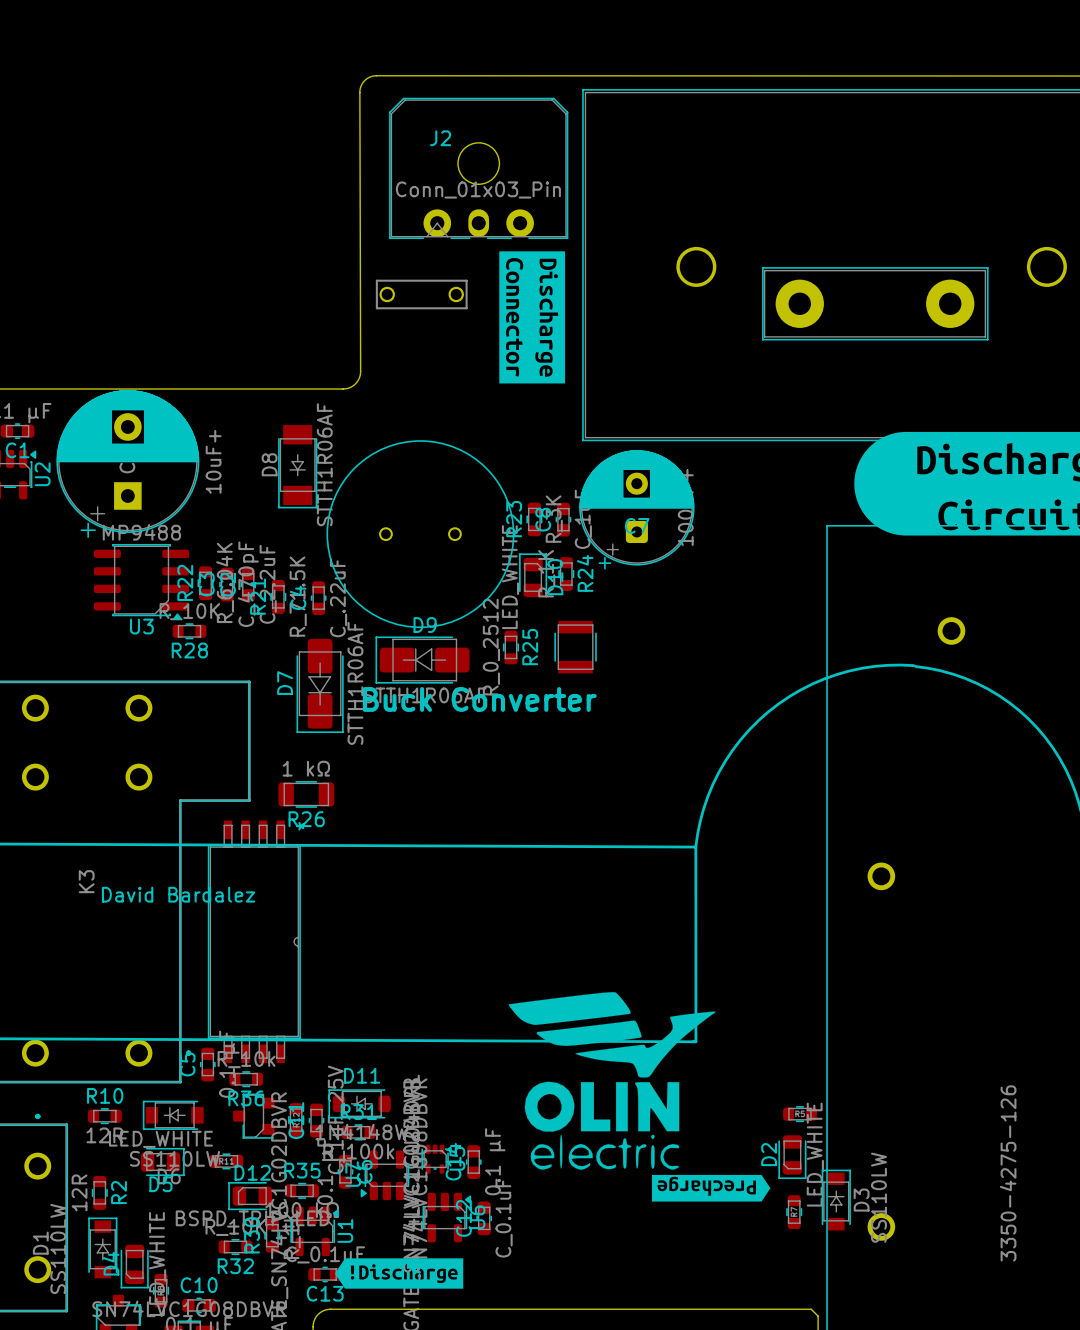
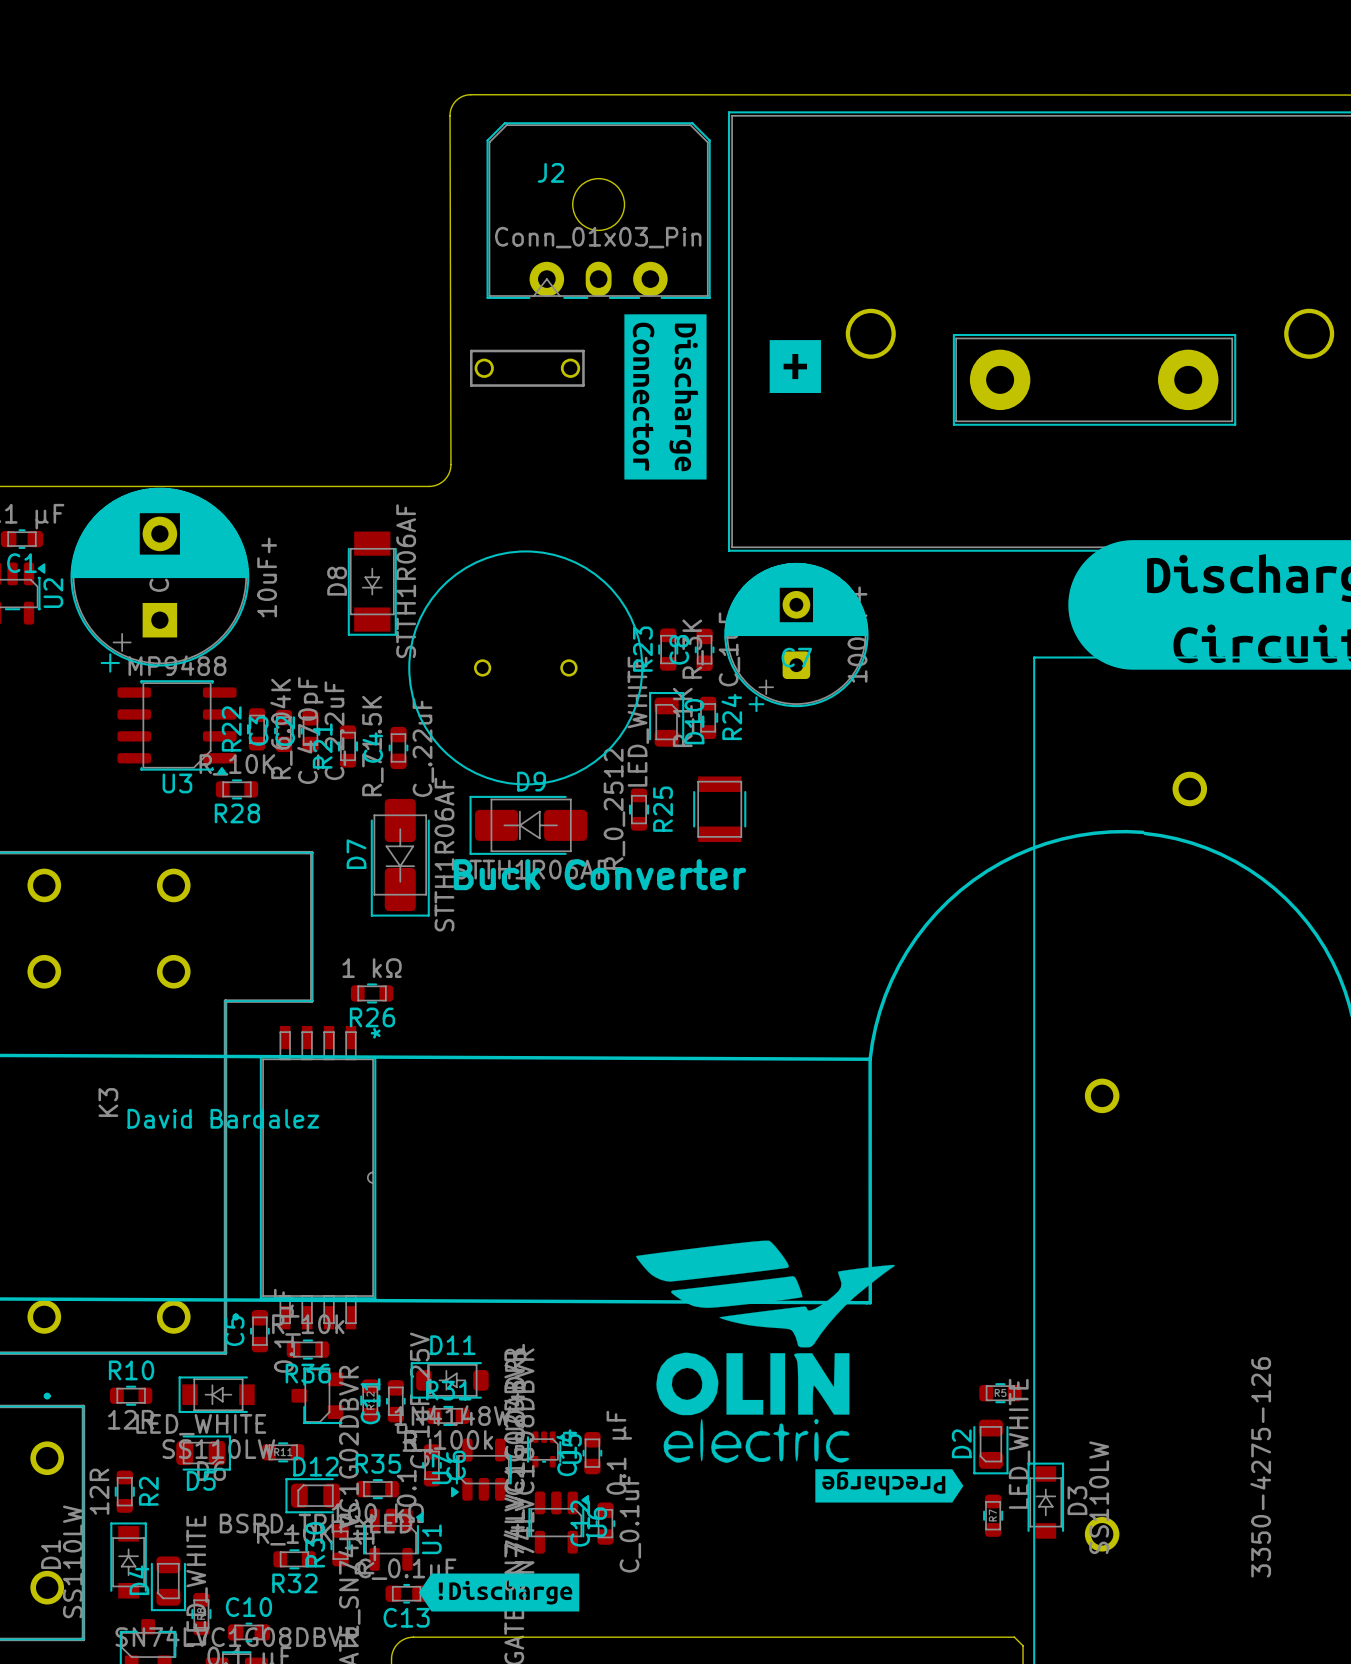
drawing: none -> [769, 340, 821, 394]
R26 footprint: [278, 781, 335, 808] -> [350, 983, 394, 1004]

